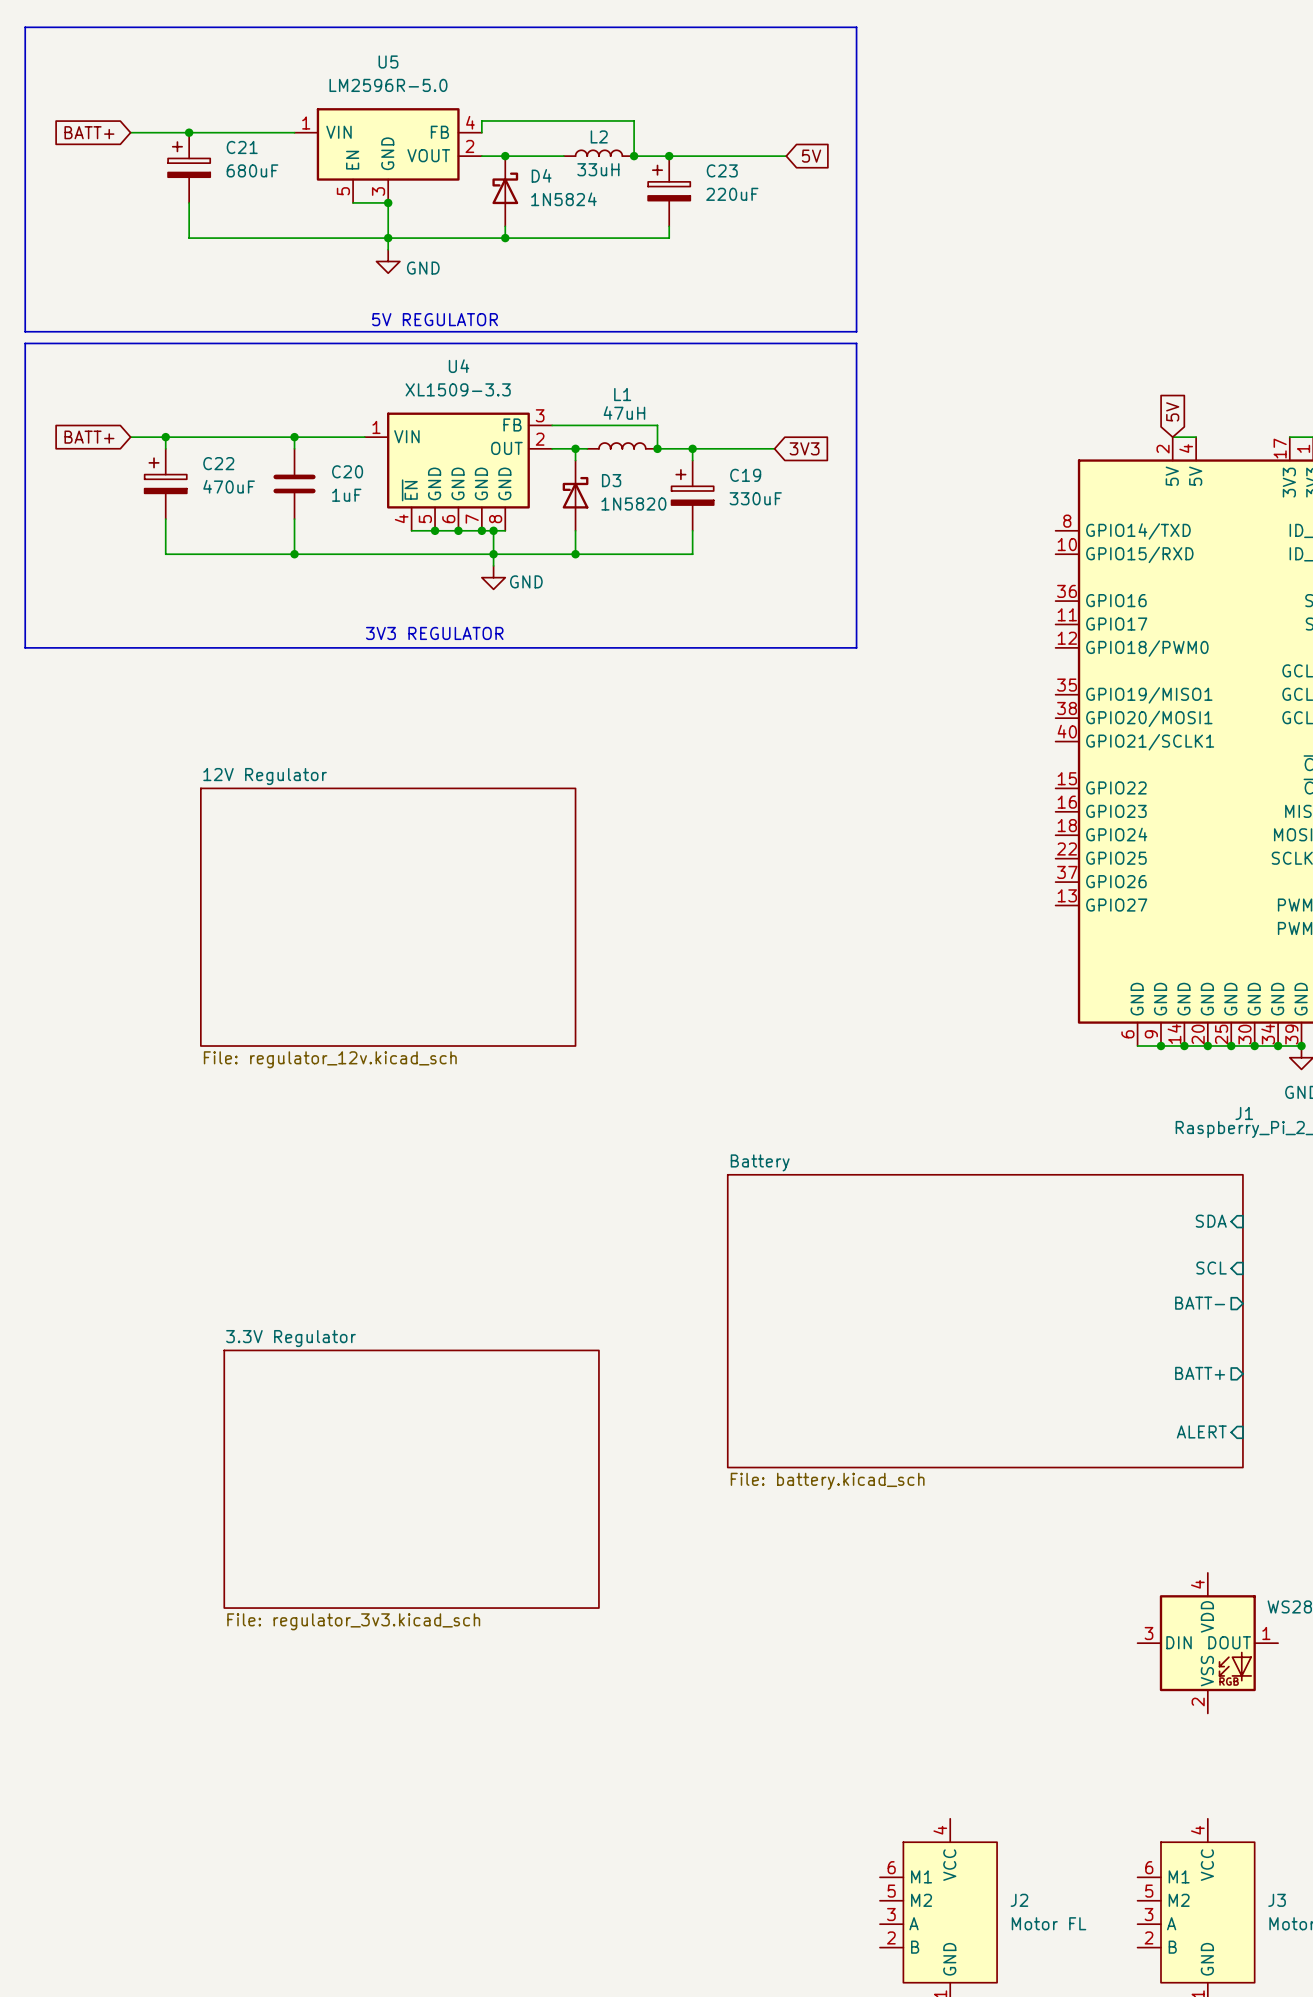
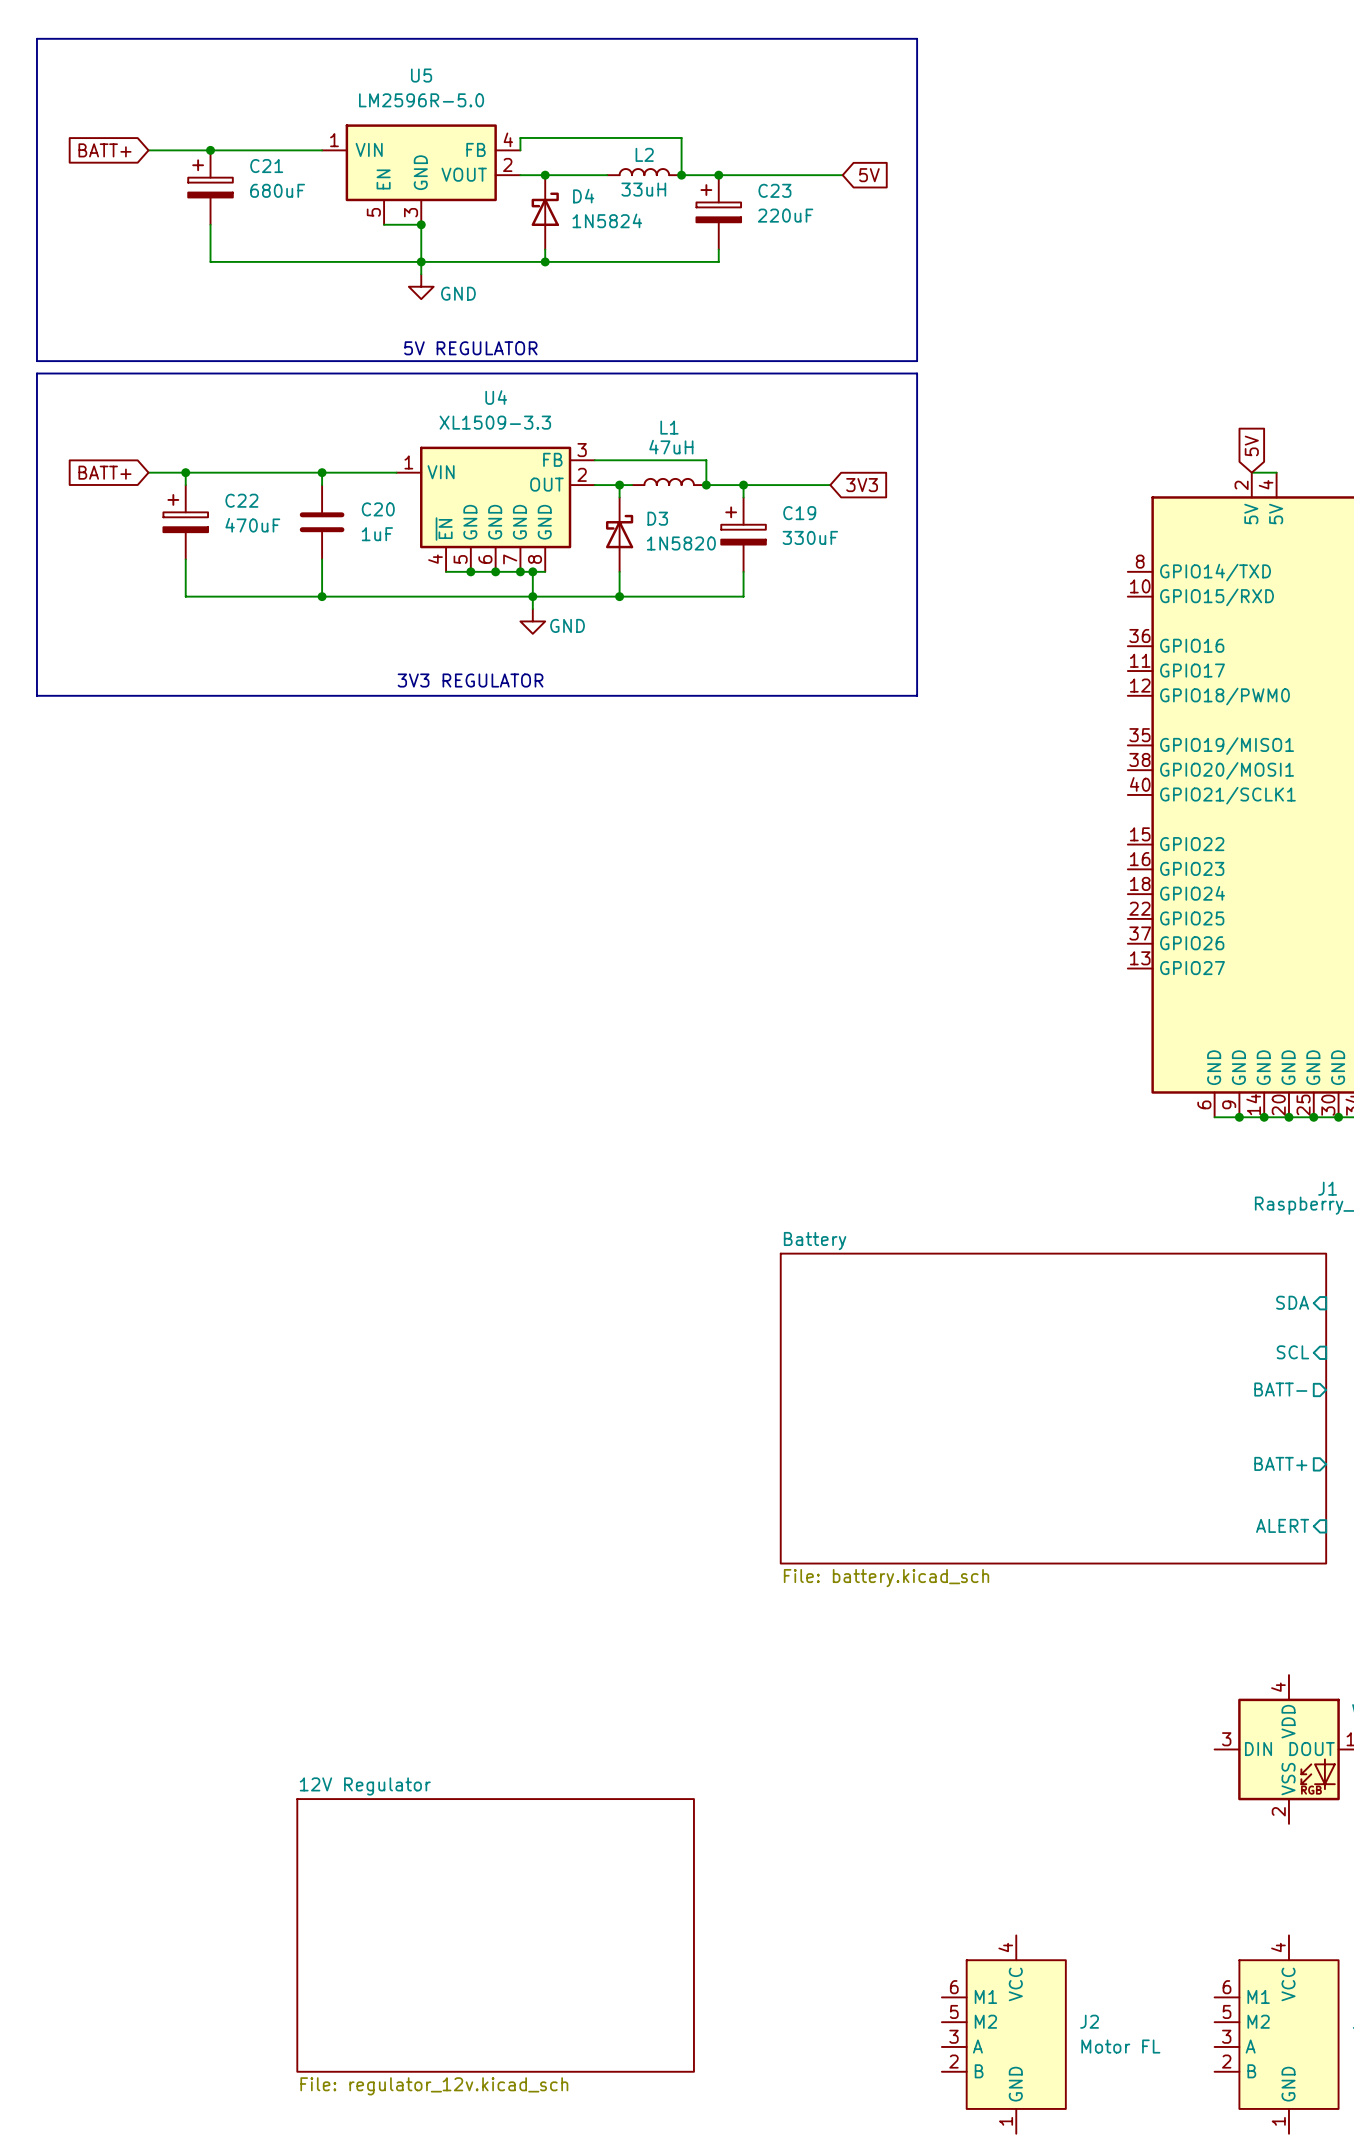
sheet 12V Regulator position: (388, 917) -> (495, 1935)
sheet 3.3V Regulator: File: regulator_3v3.kicad_sch (411, 1479) -> none

